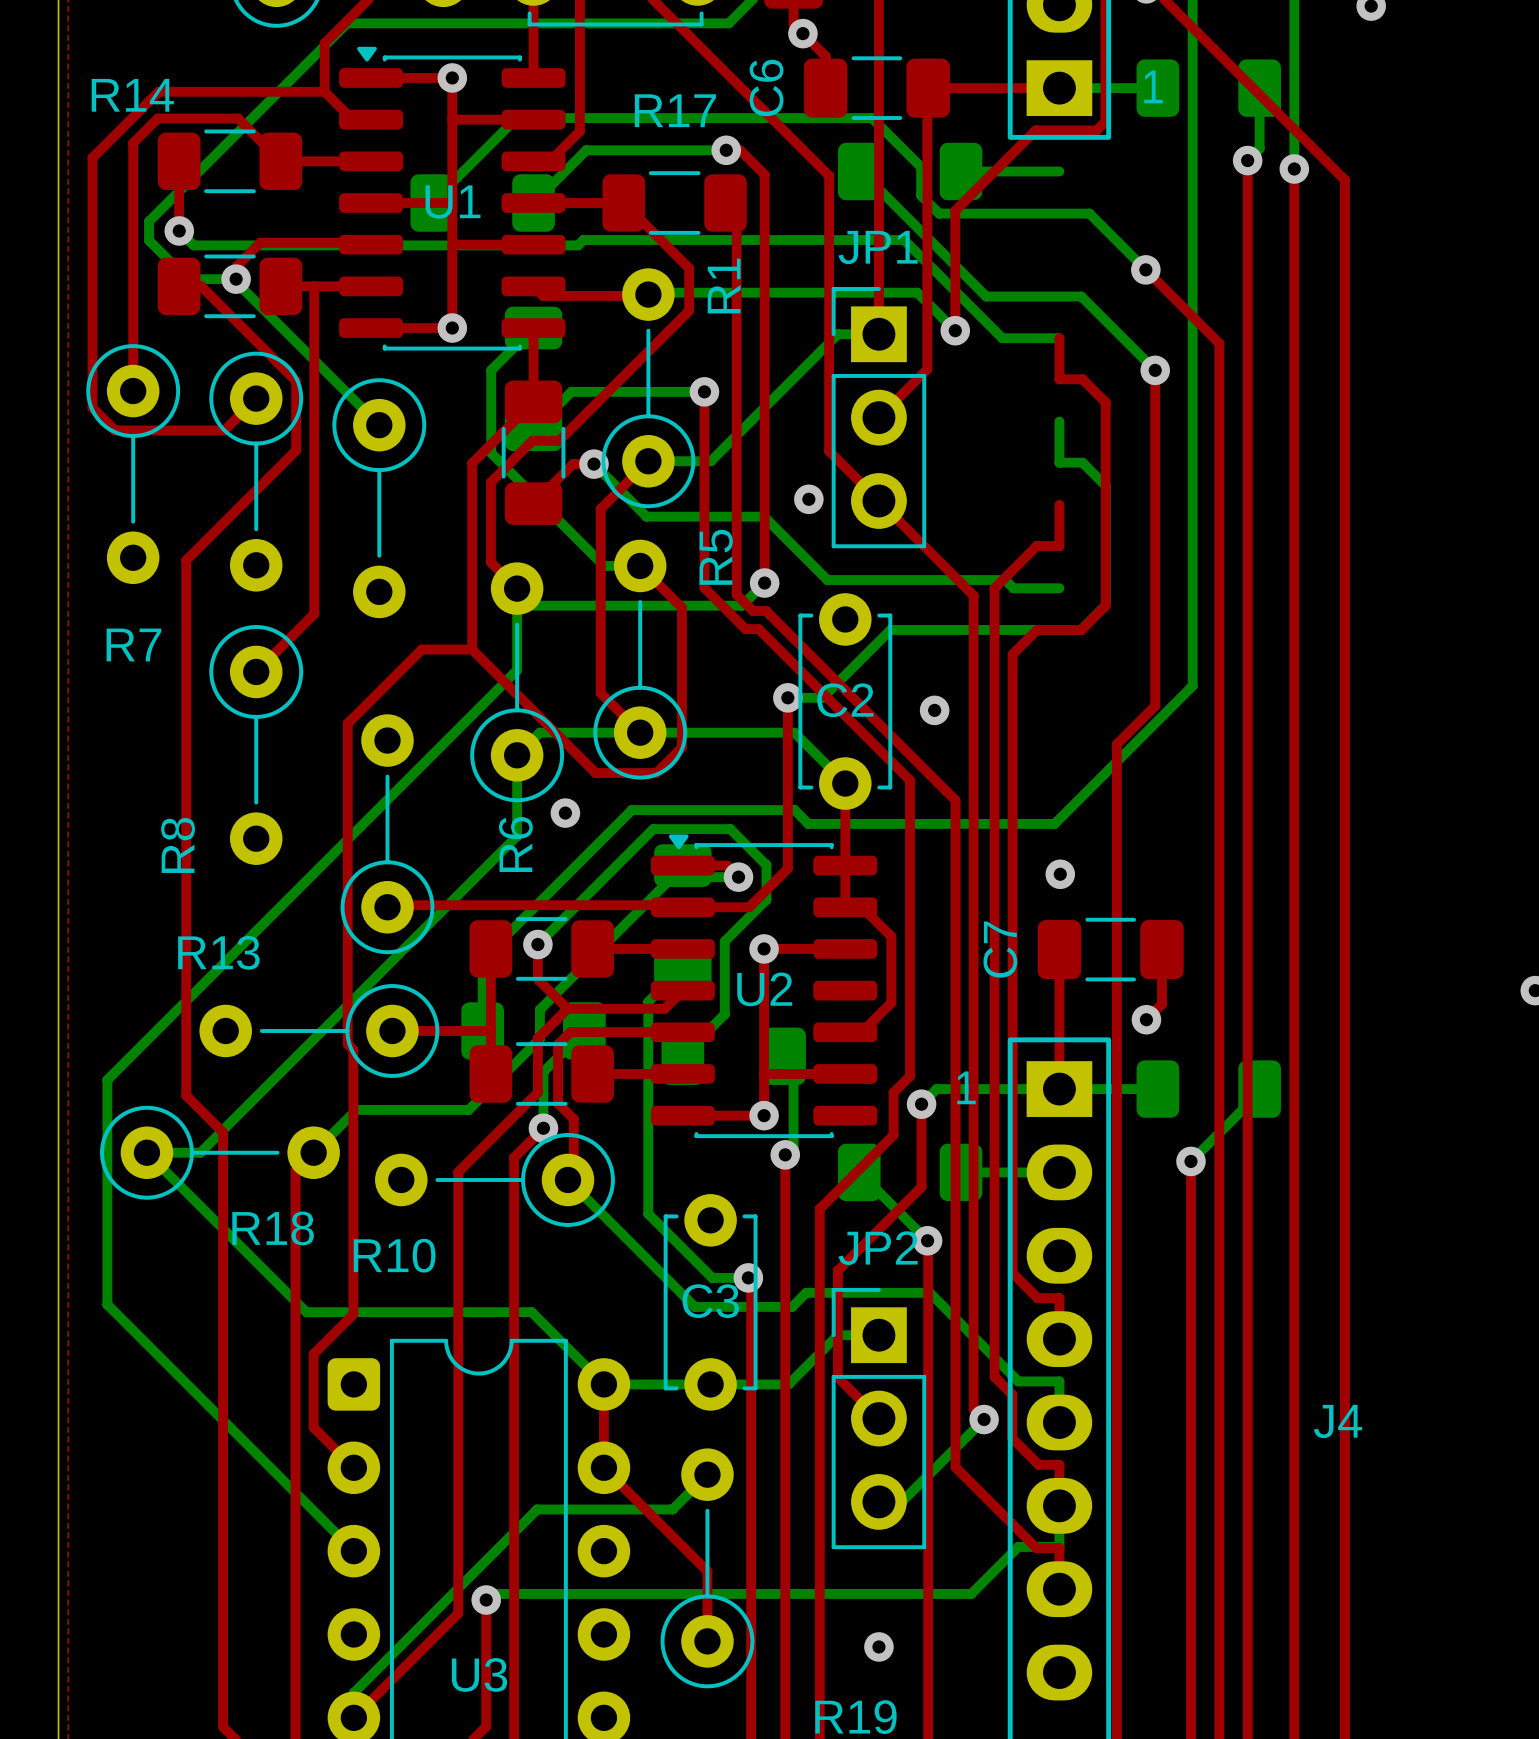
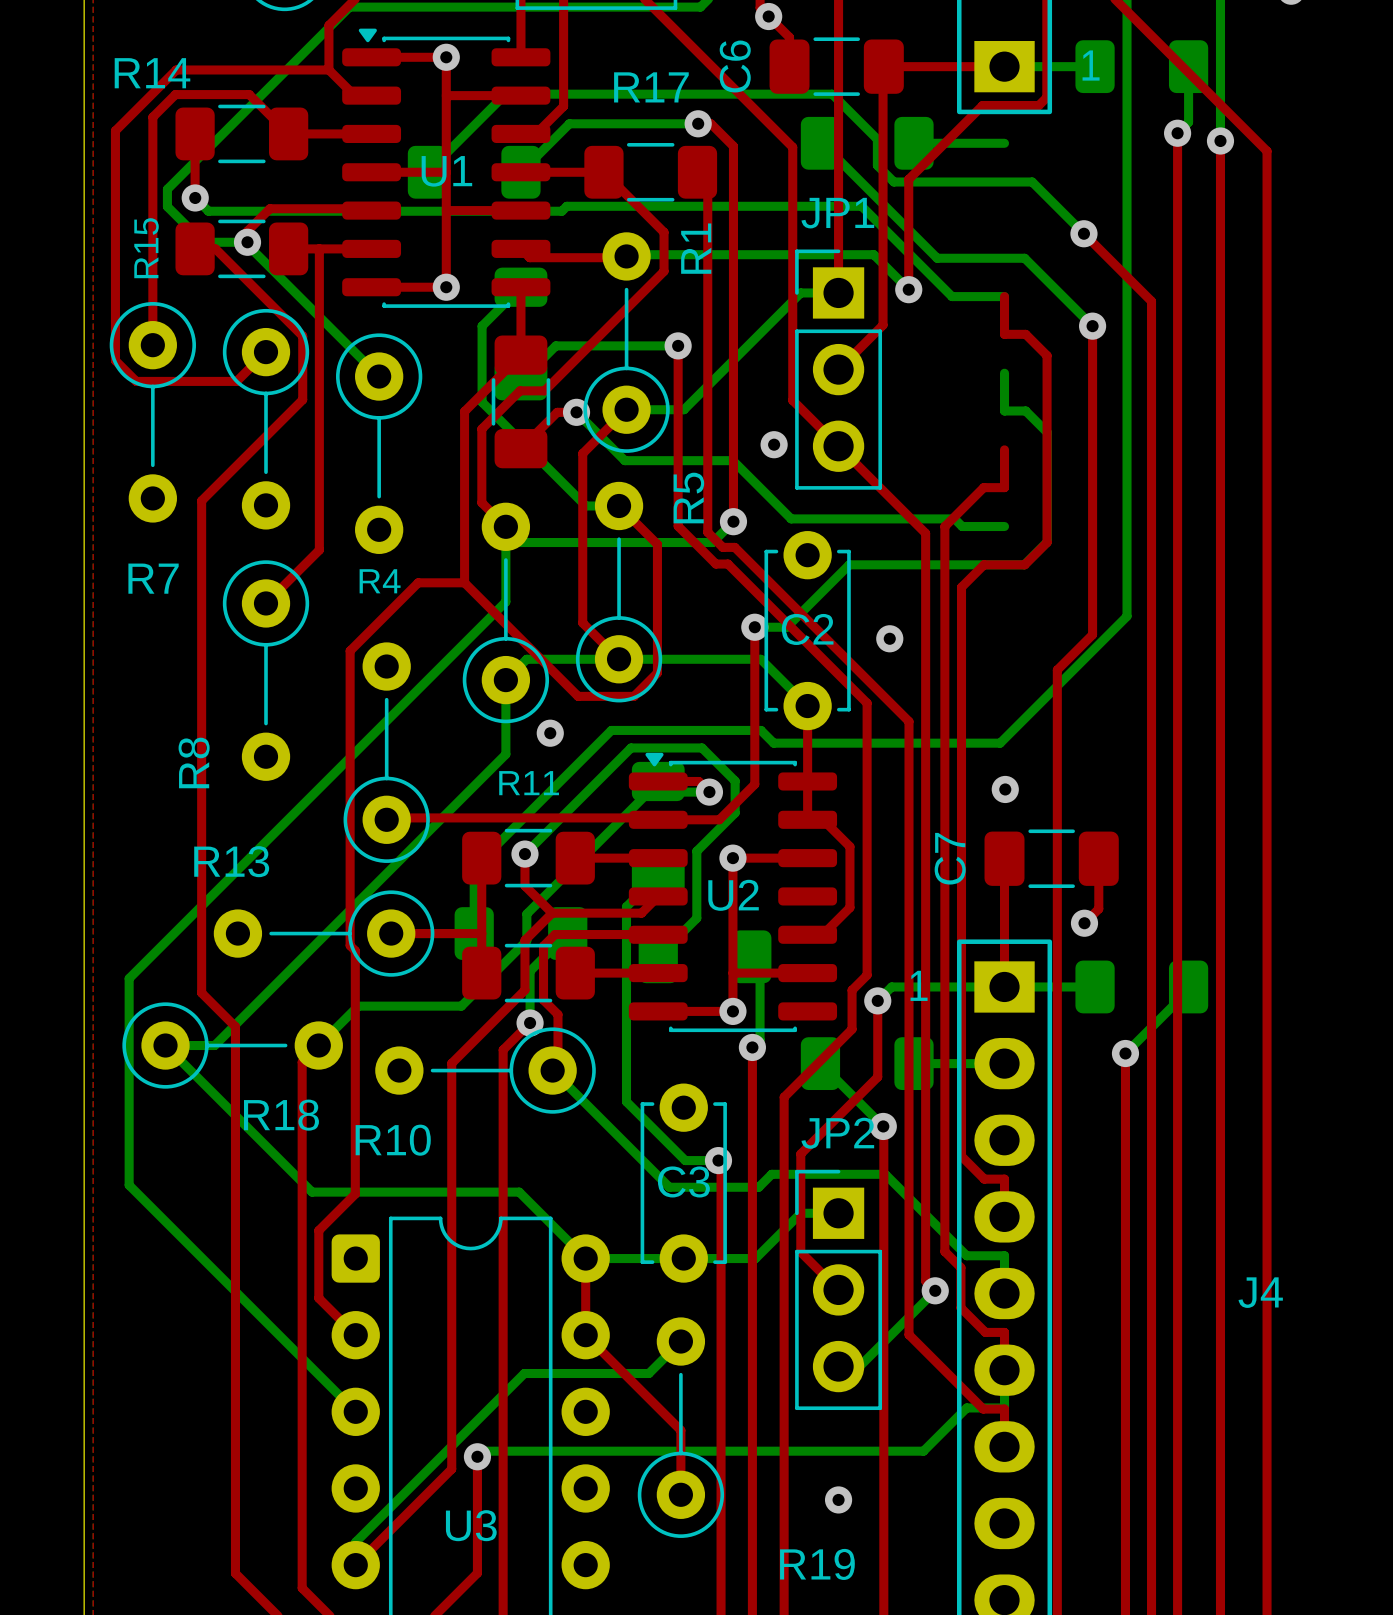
R15 name: none -> R15 (146, 248)
R4 name: none -> R4 (380, 581)
R6 name: R6 (515, 844) -> none
R11 name: none -> R11 (529, 783)

